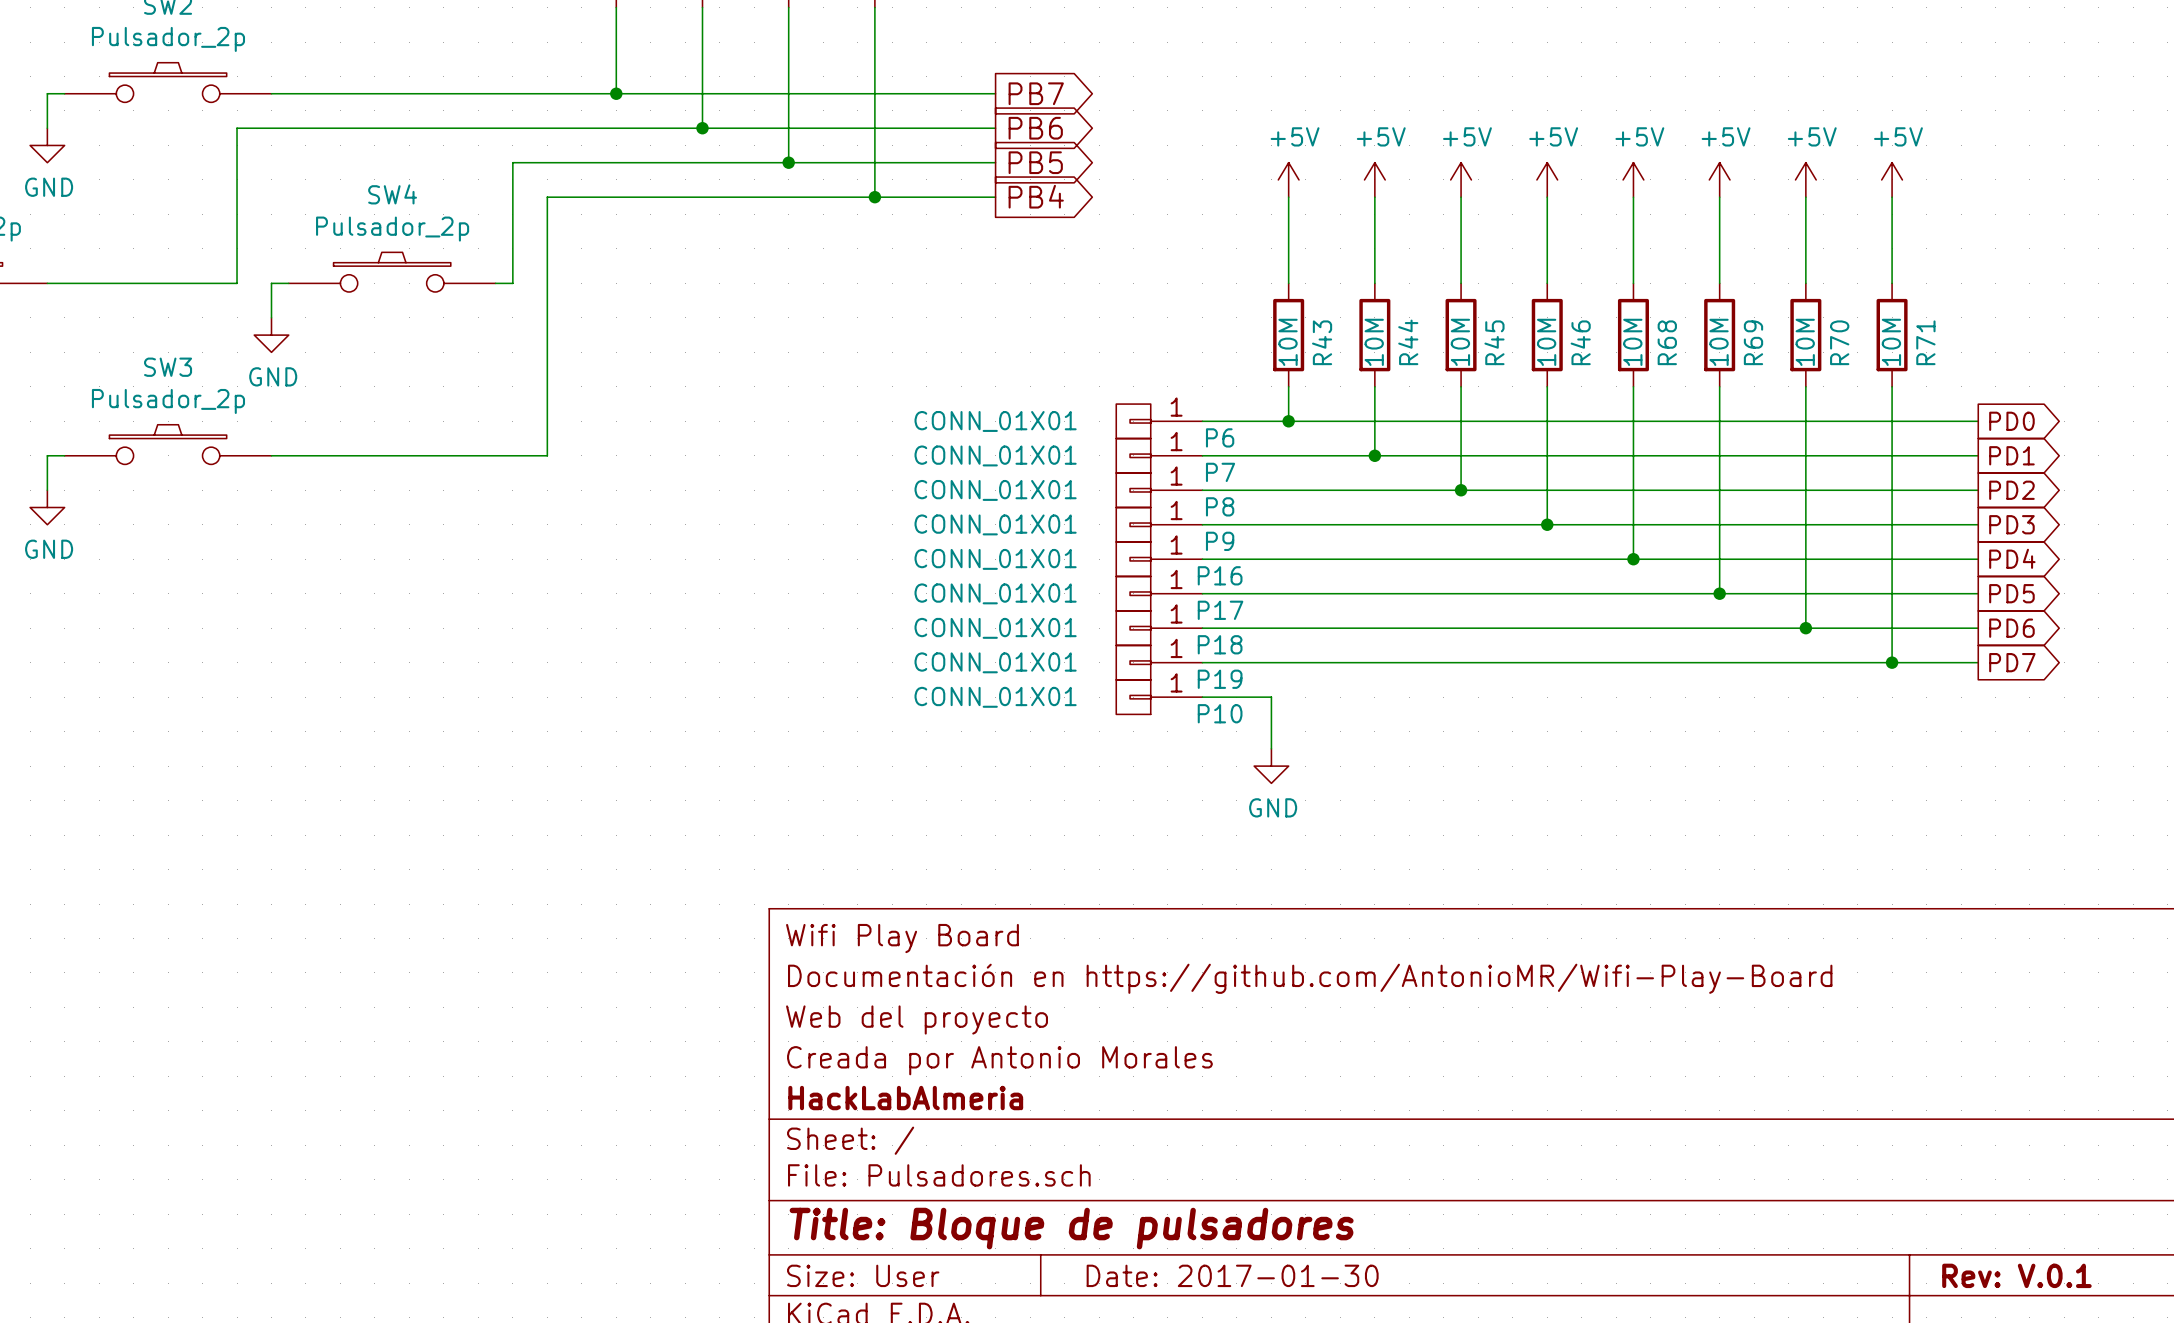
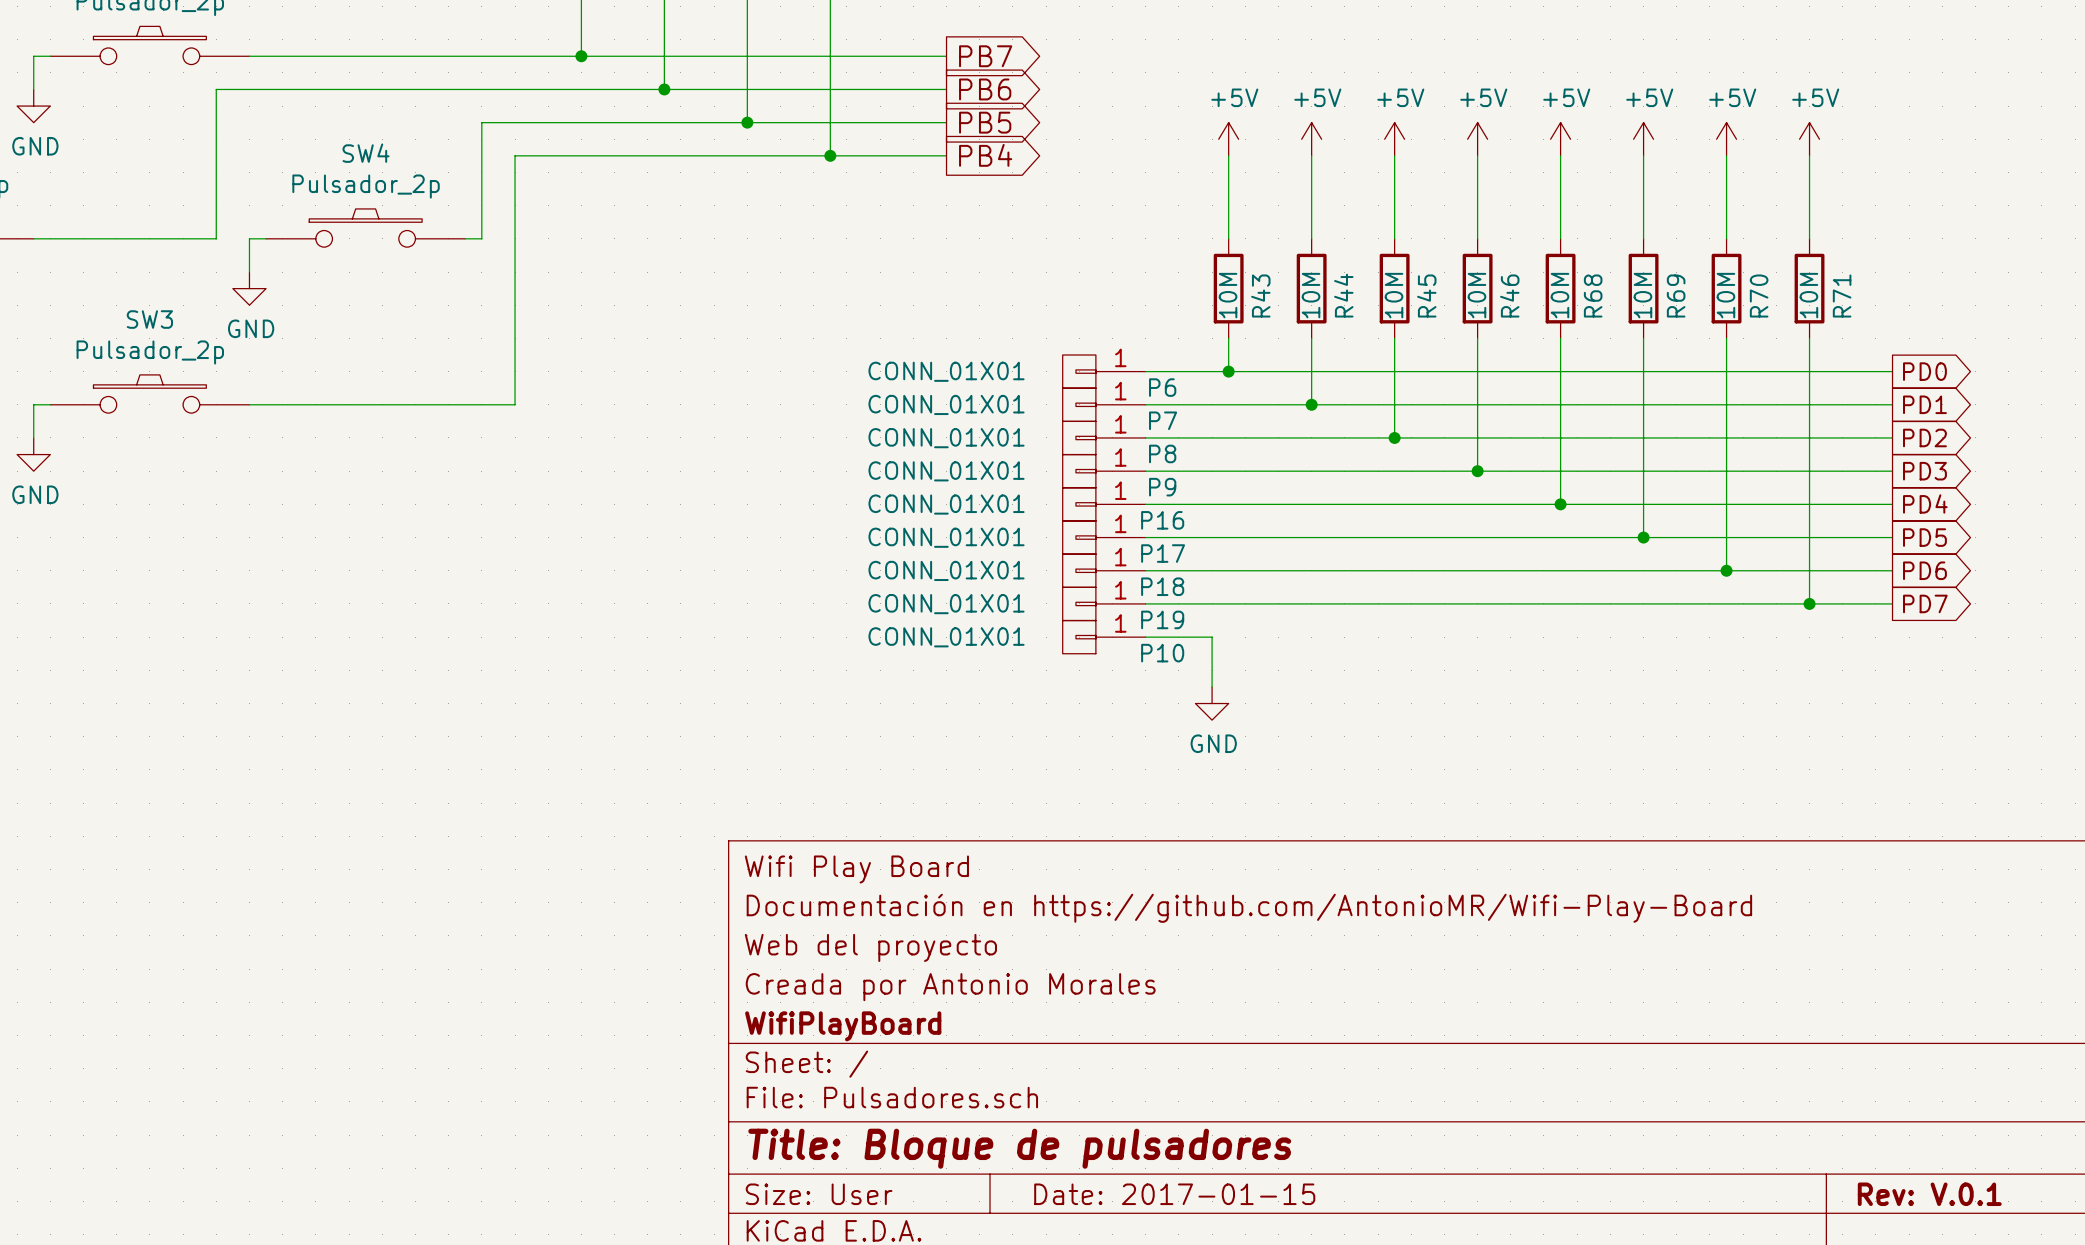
title block: HackLabAlmeria (905, 1098) -> WifiPlayBoard (843, 1026)
title block: Date: 2017-01-30 (1232, 1275) -> Date: 2017-01-15 (1174, 1194)

